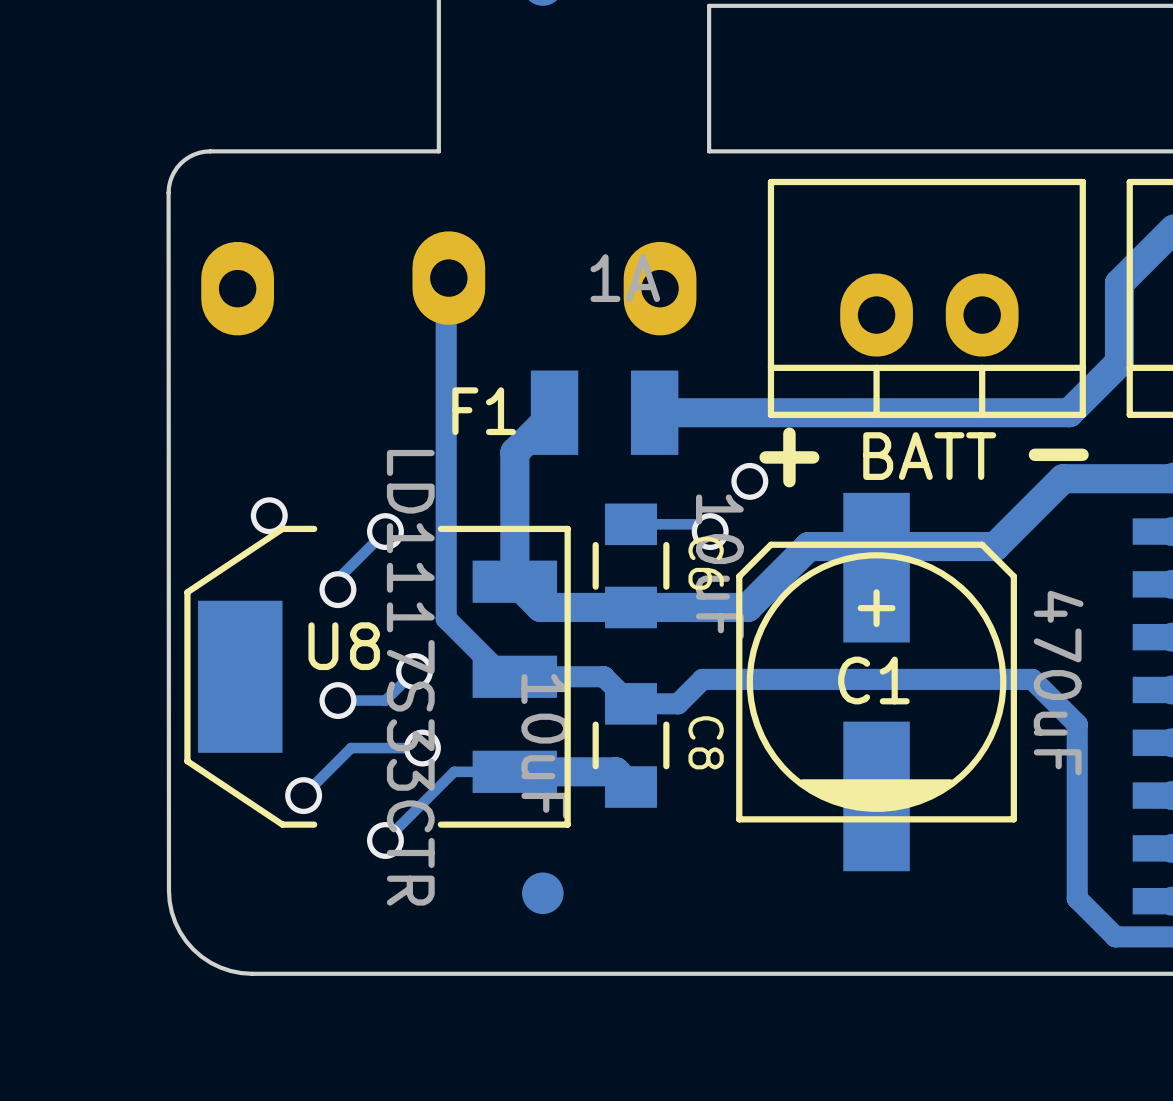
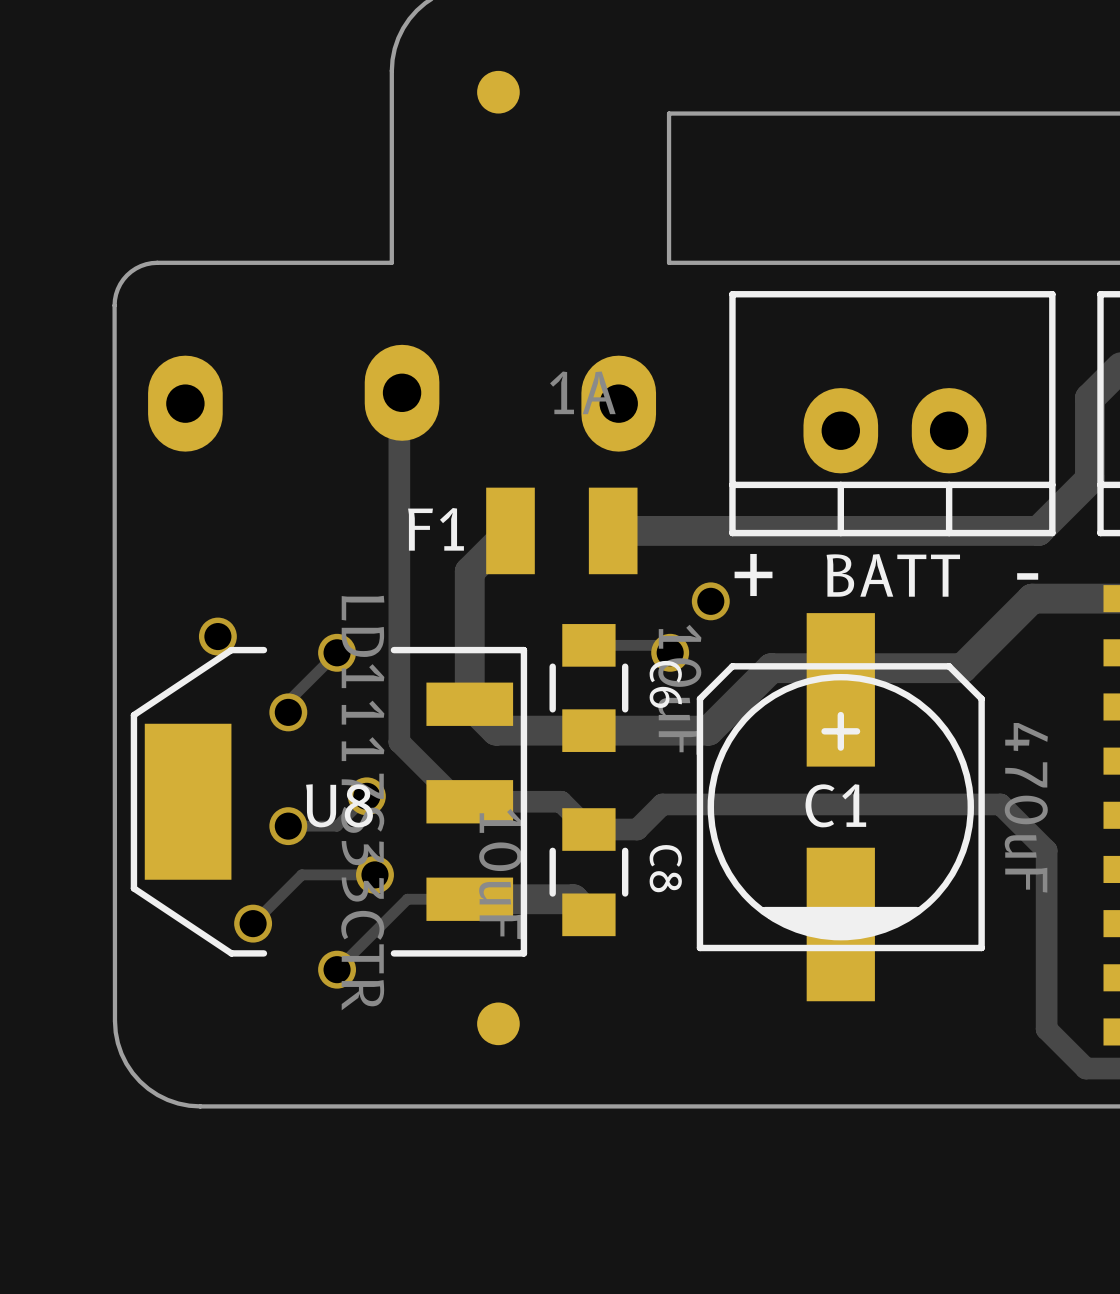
U8 name position: U8 (344, 646) -> U8 (339, 805)

